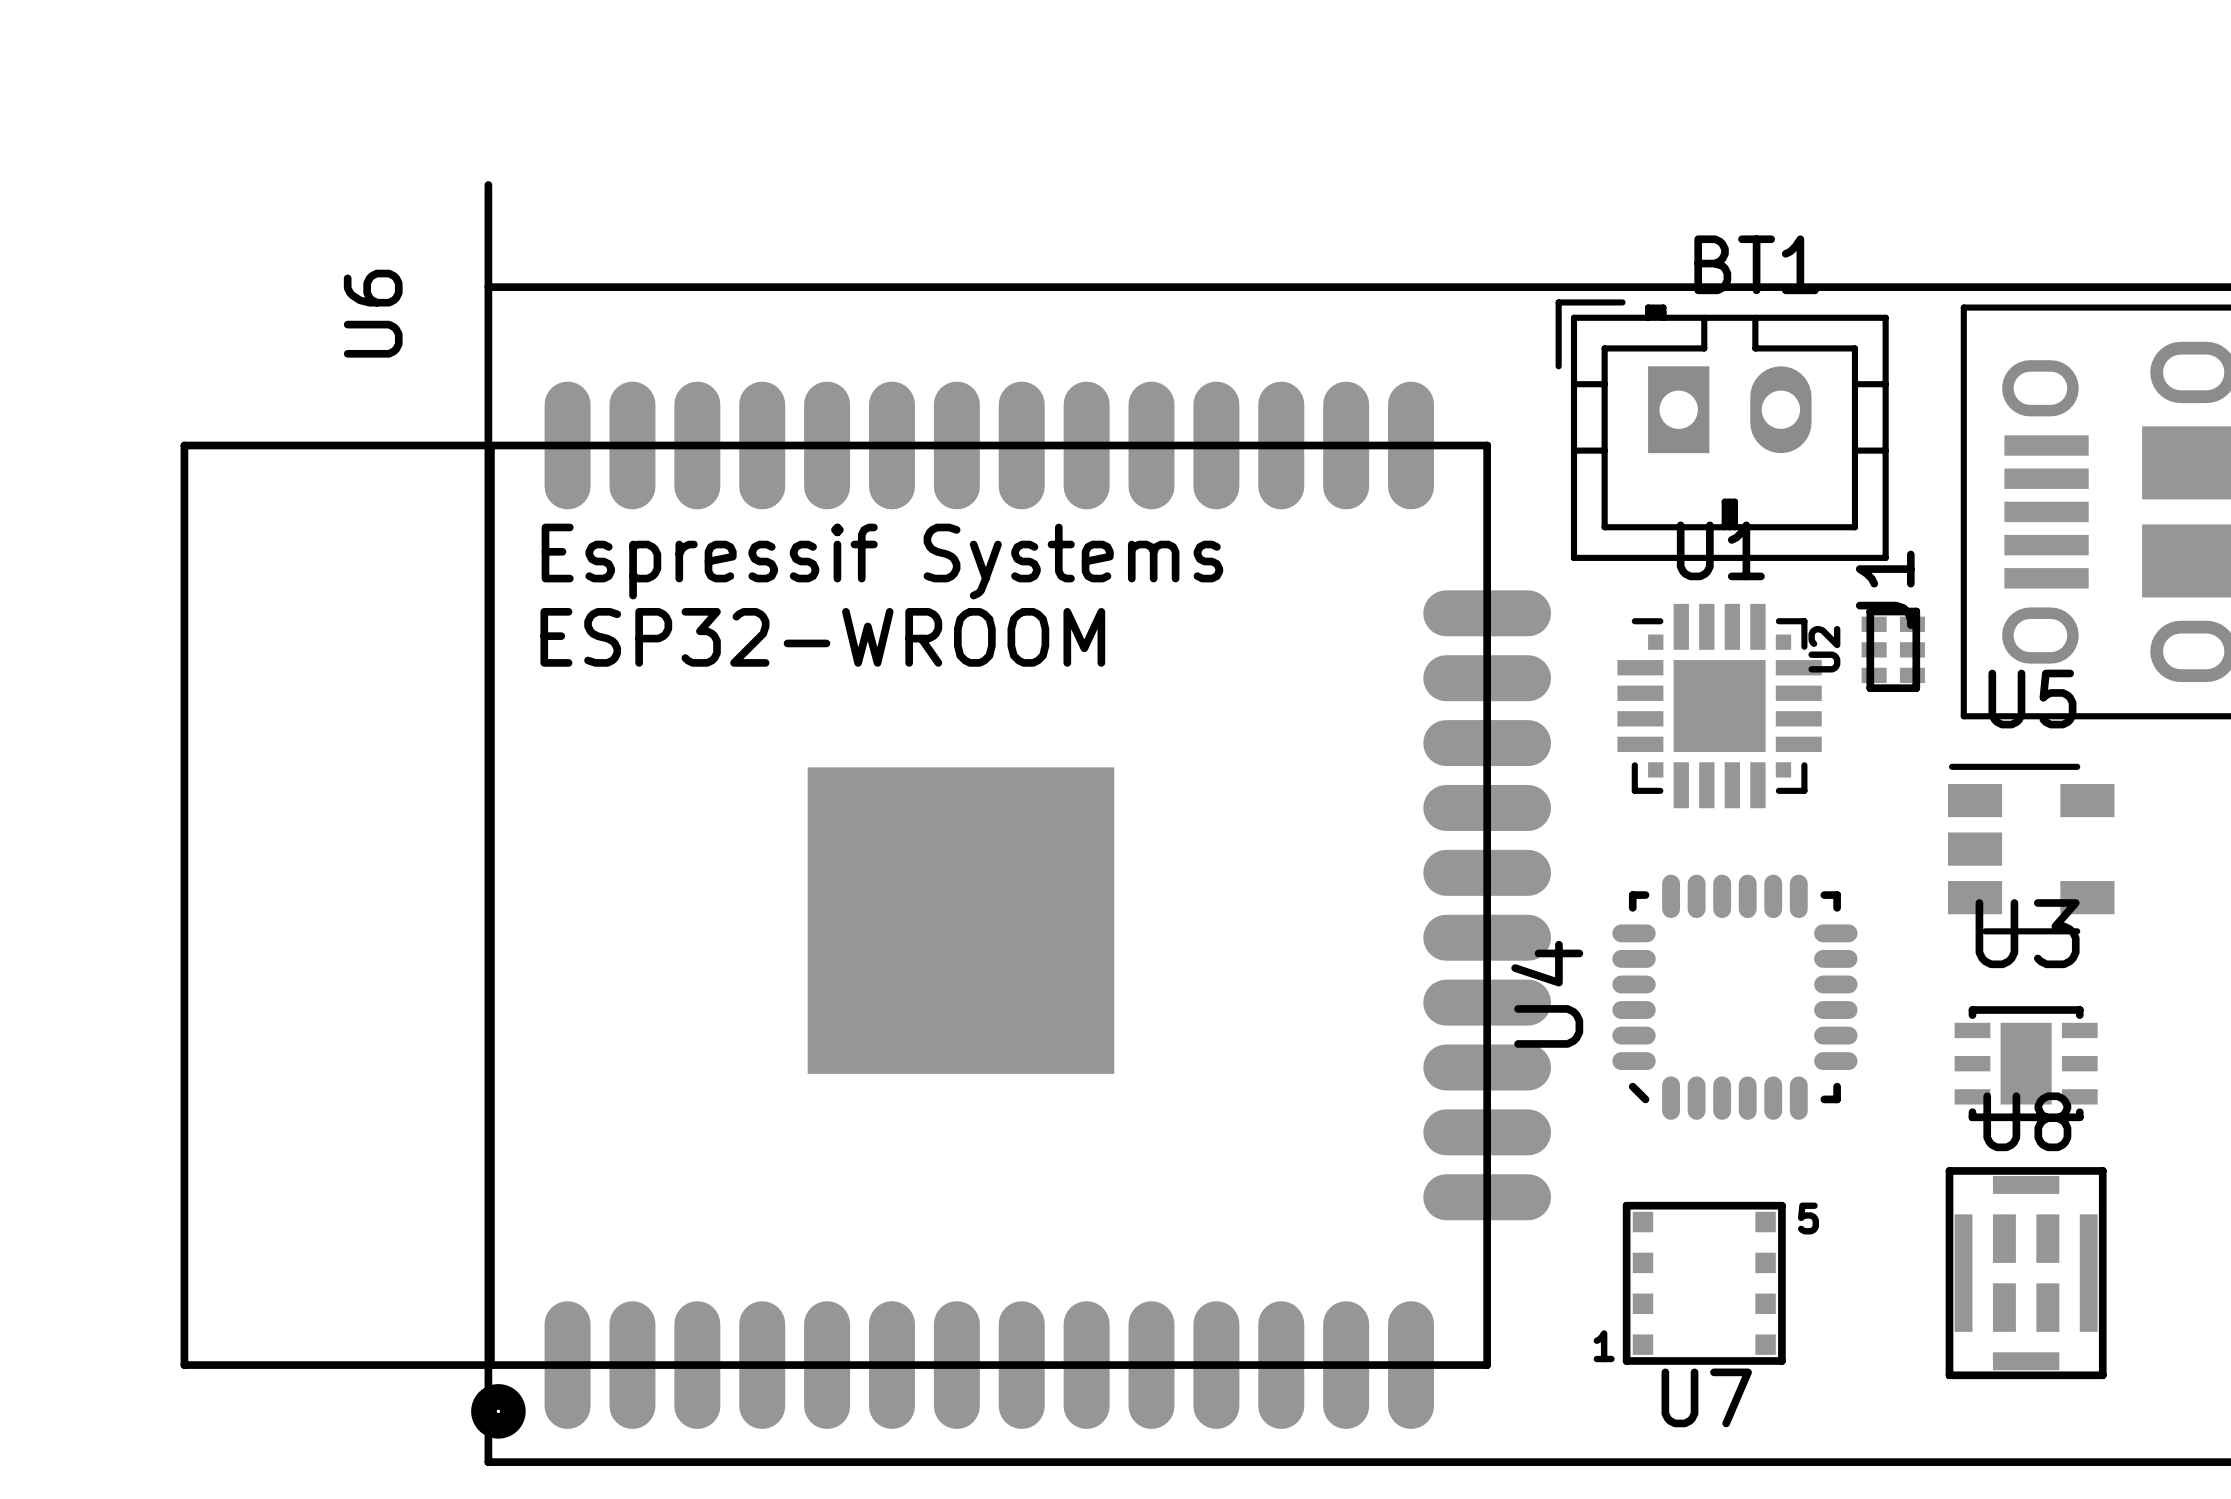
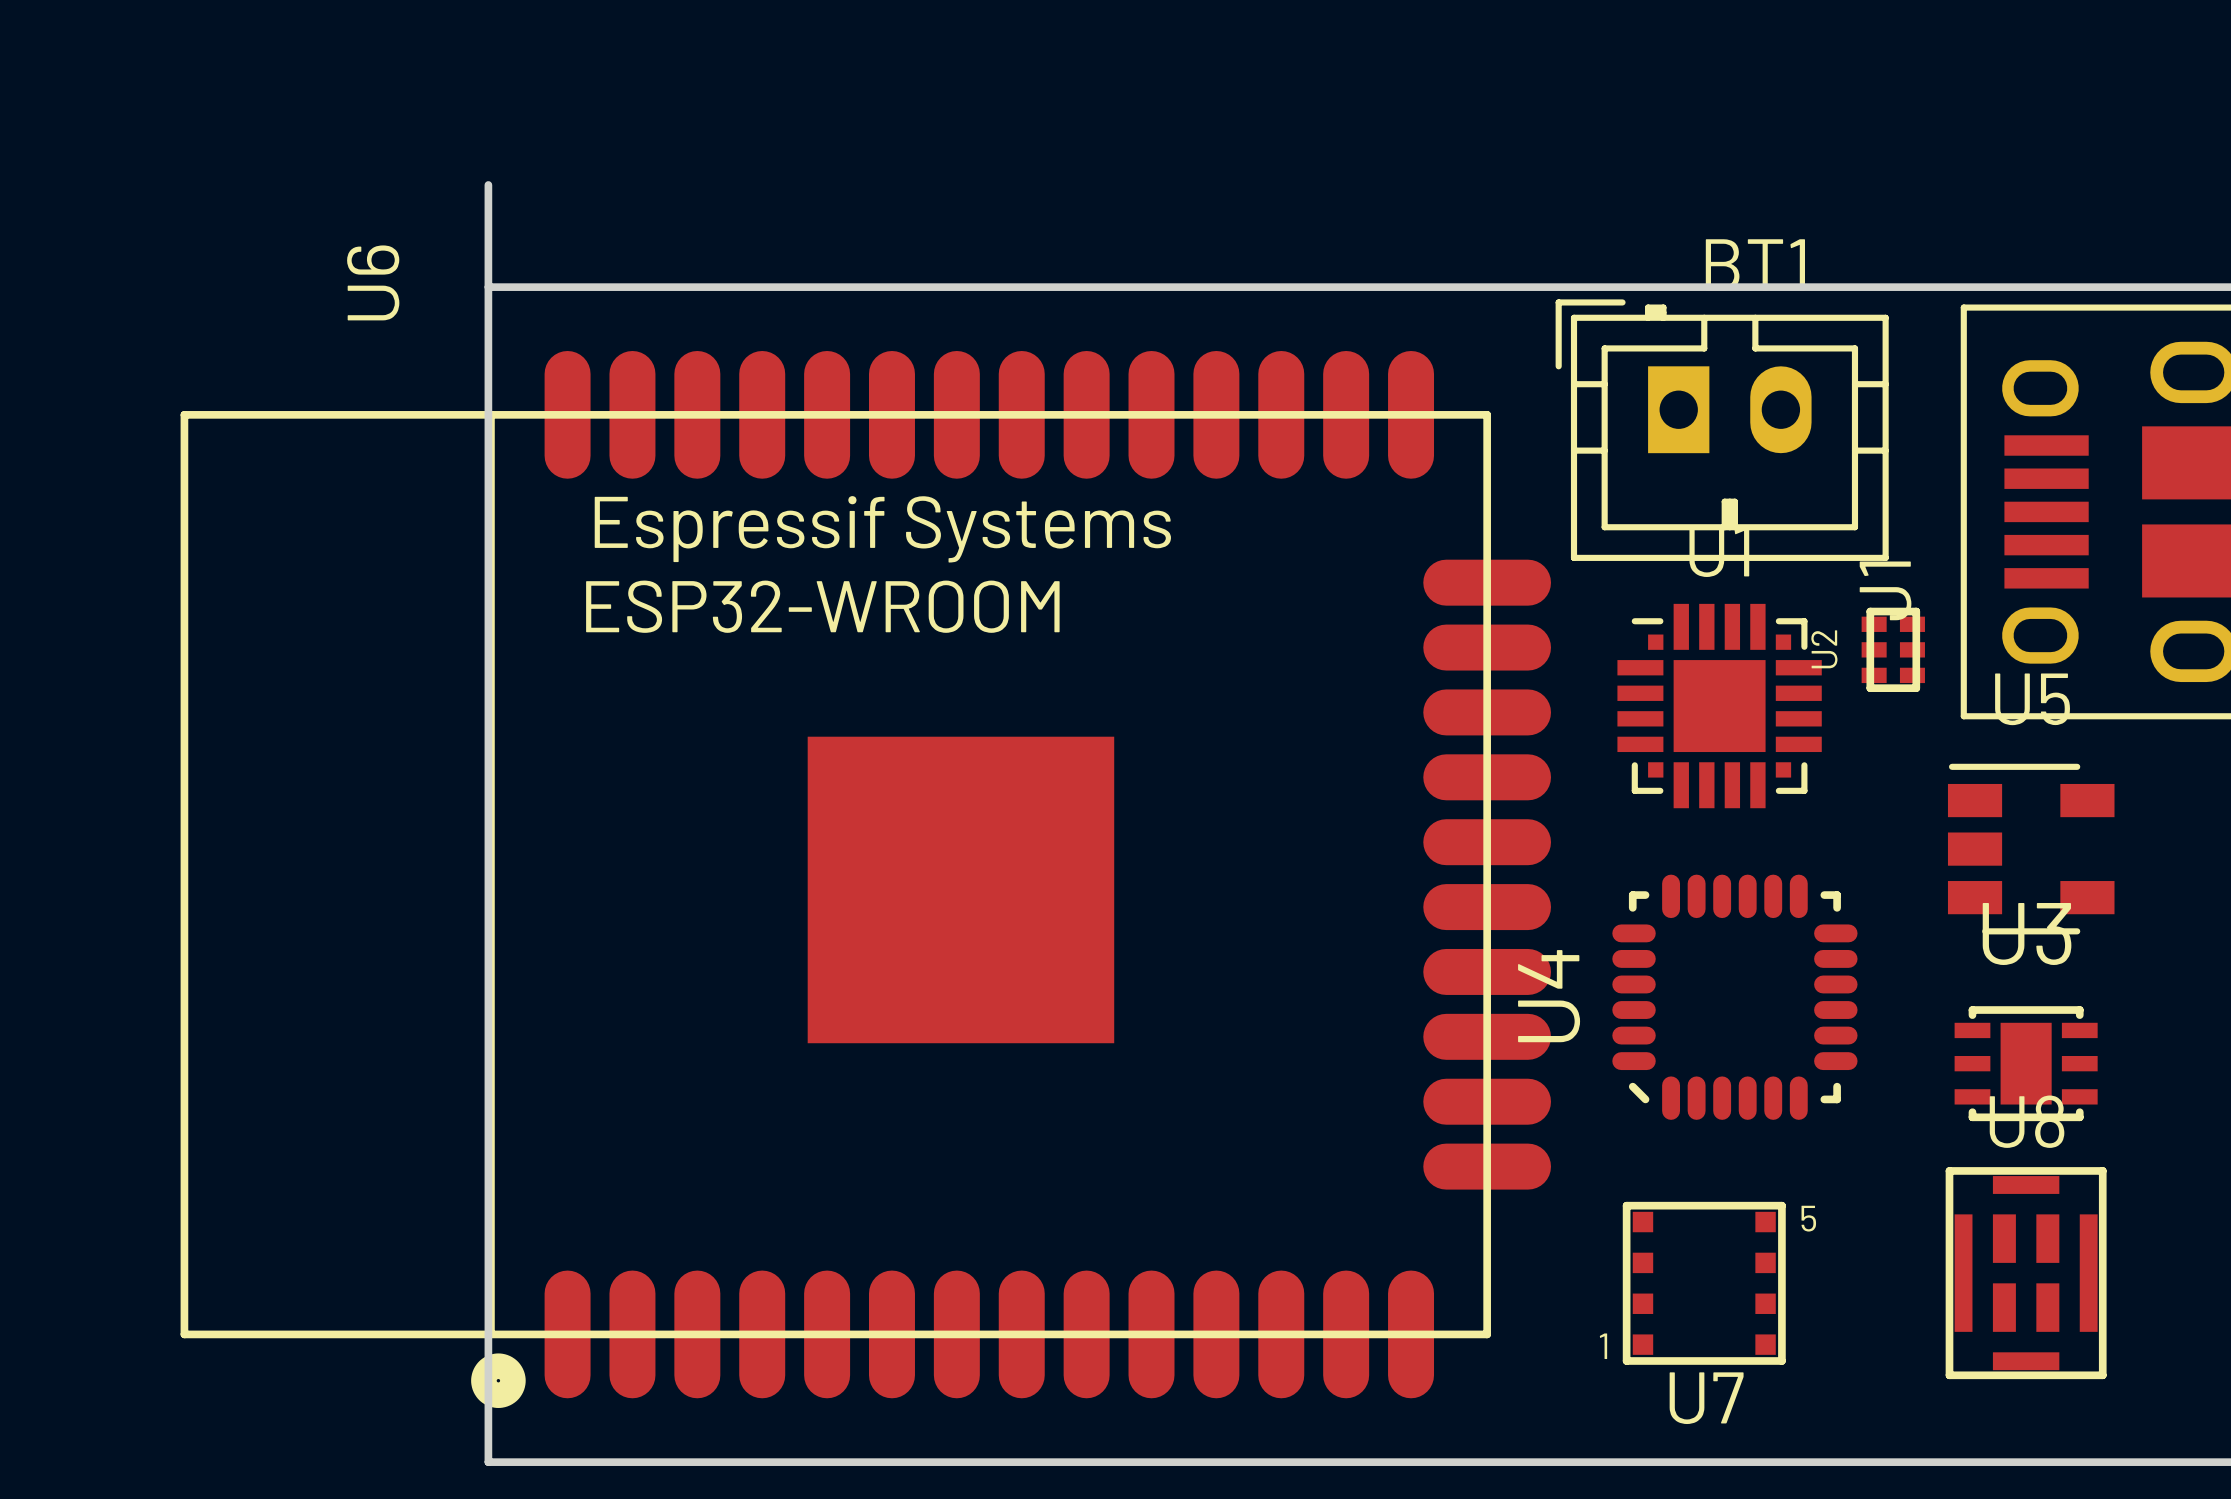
U6 position: (865, 910) -> (865, 879)

